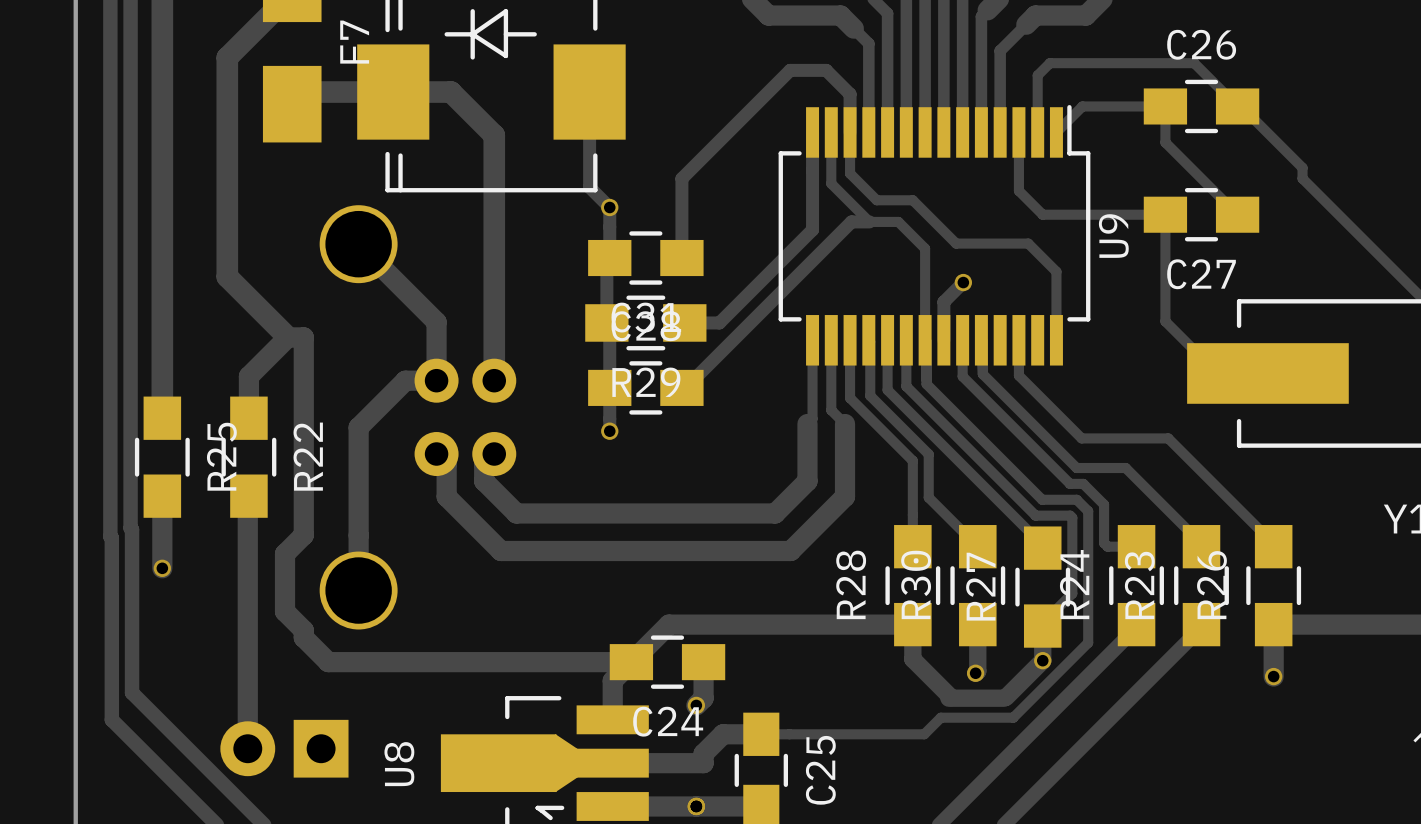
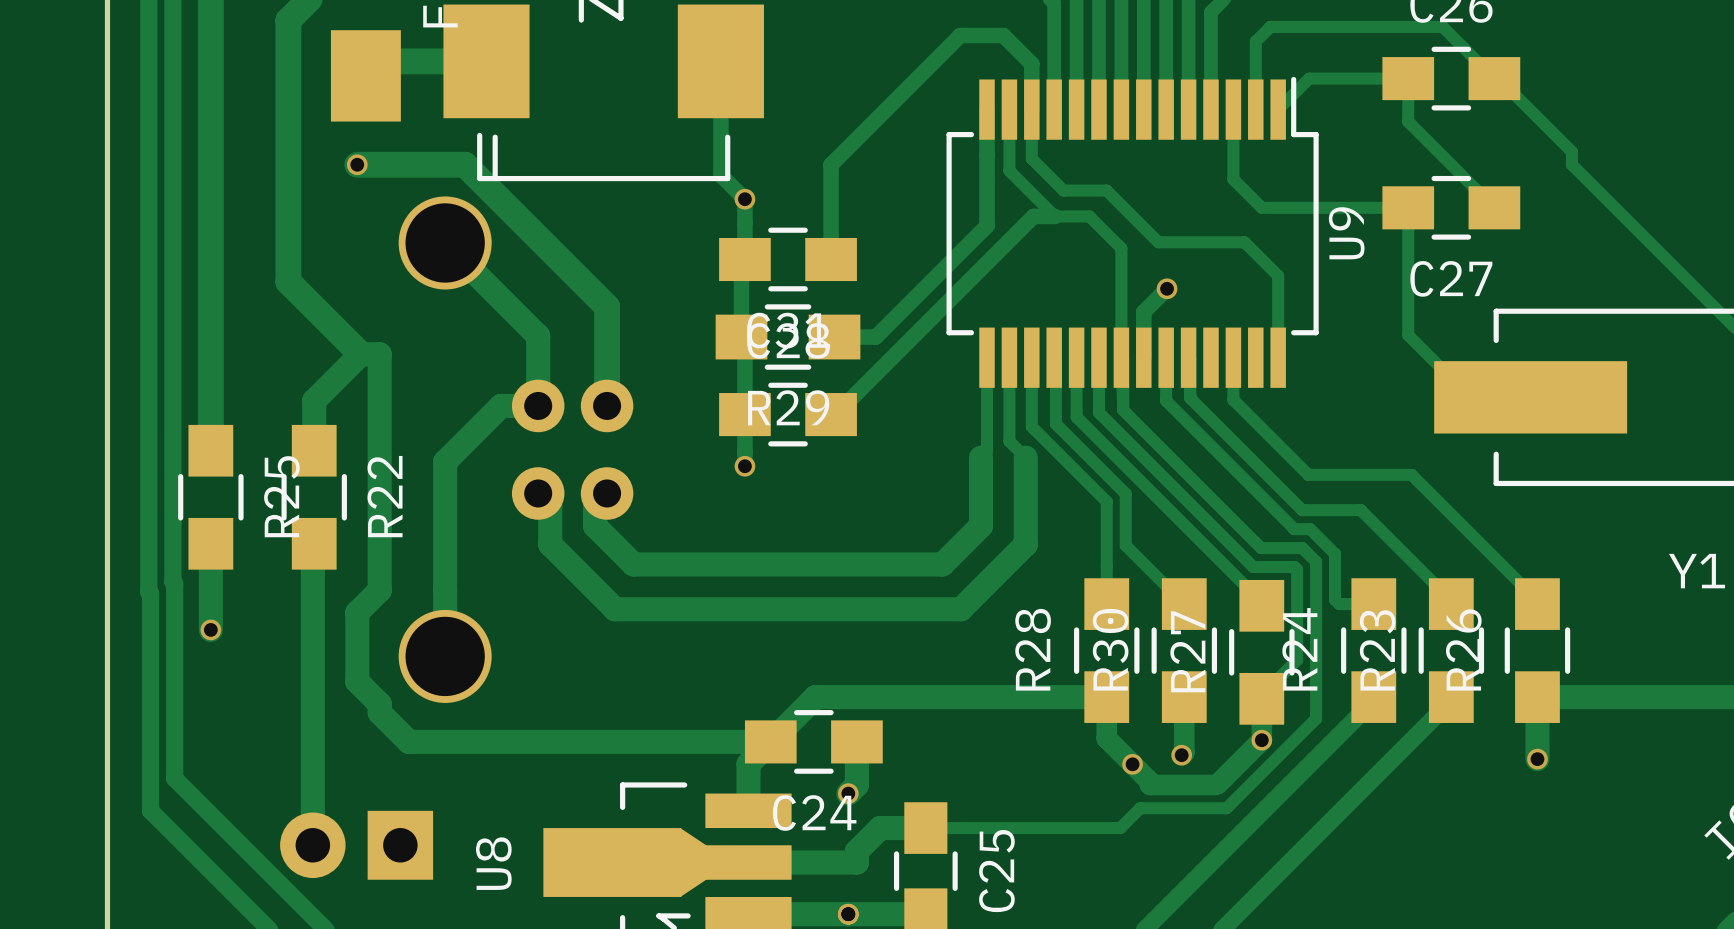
track: (393, 92) (450, 92) (494, 135) (494, 297) -> (357, 164) (465, 164) (607, 306)
via: none -> (357, 164)
via: none -> (1132, 764)

